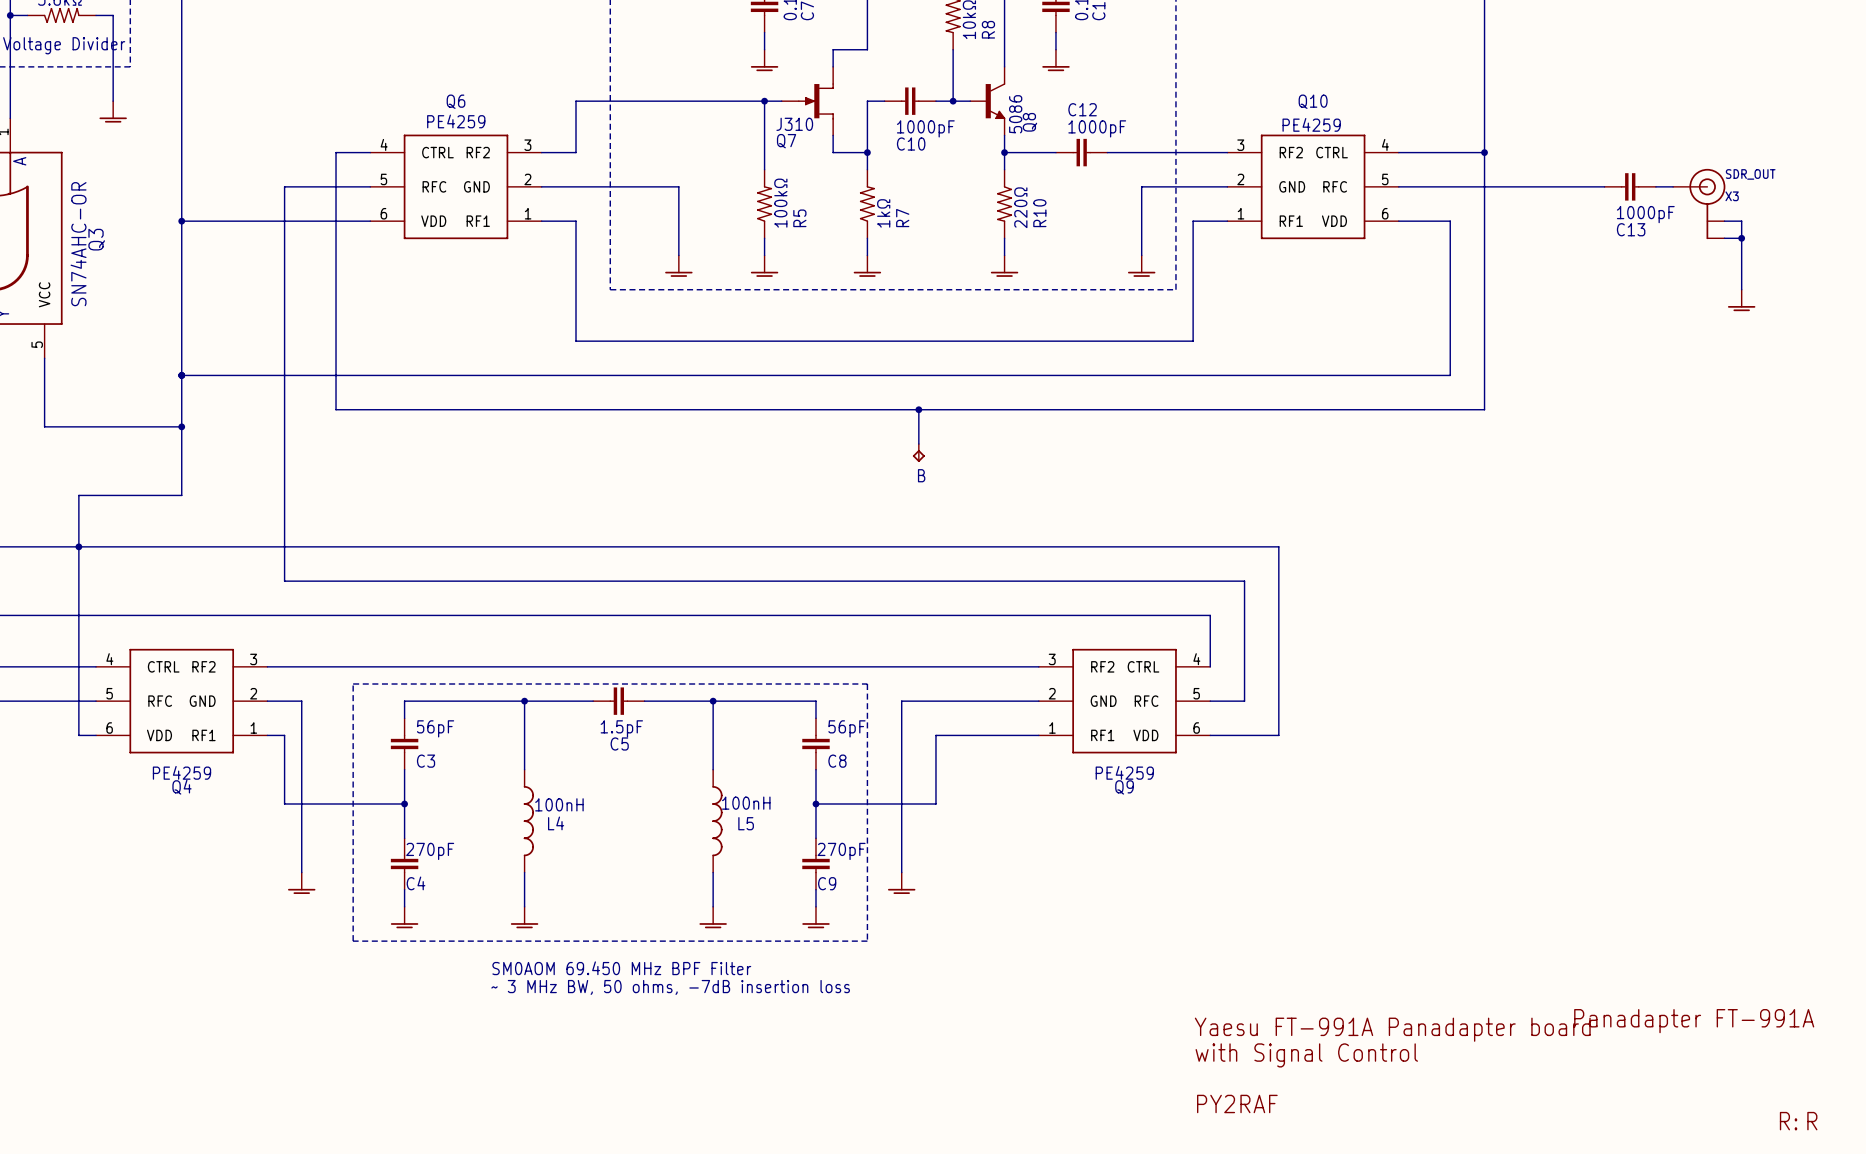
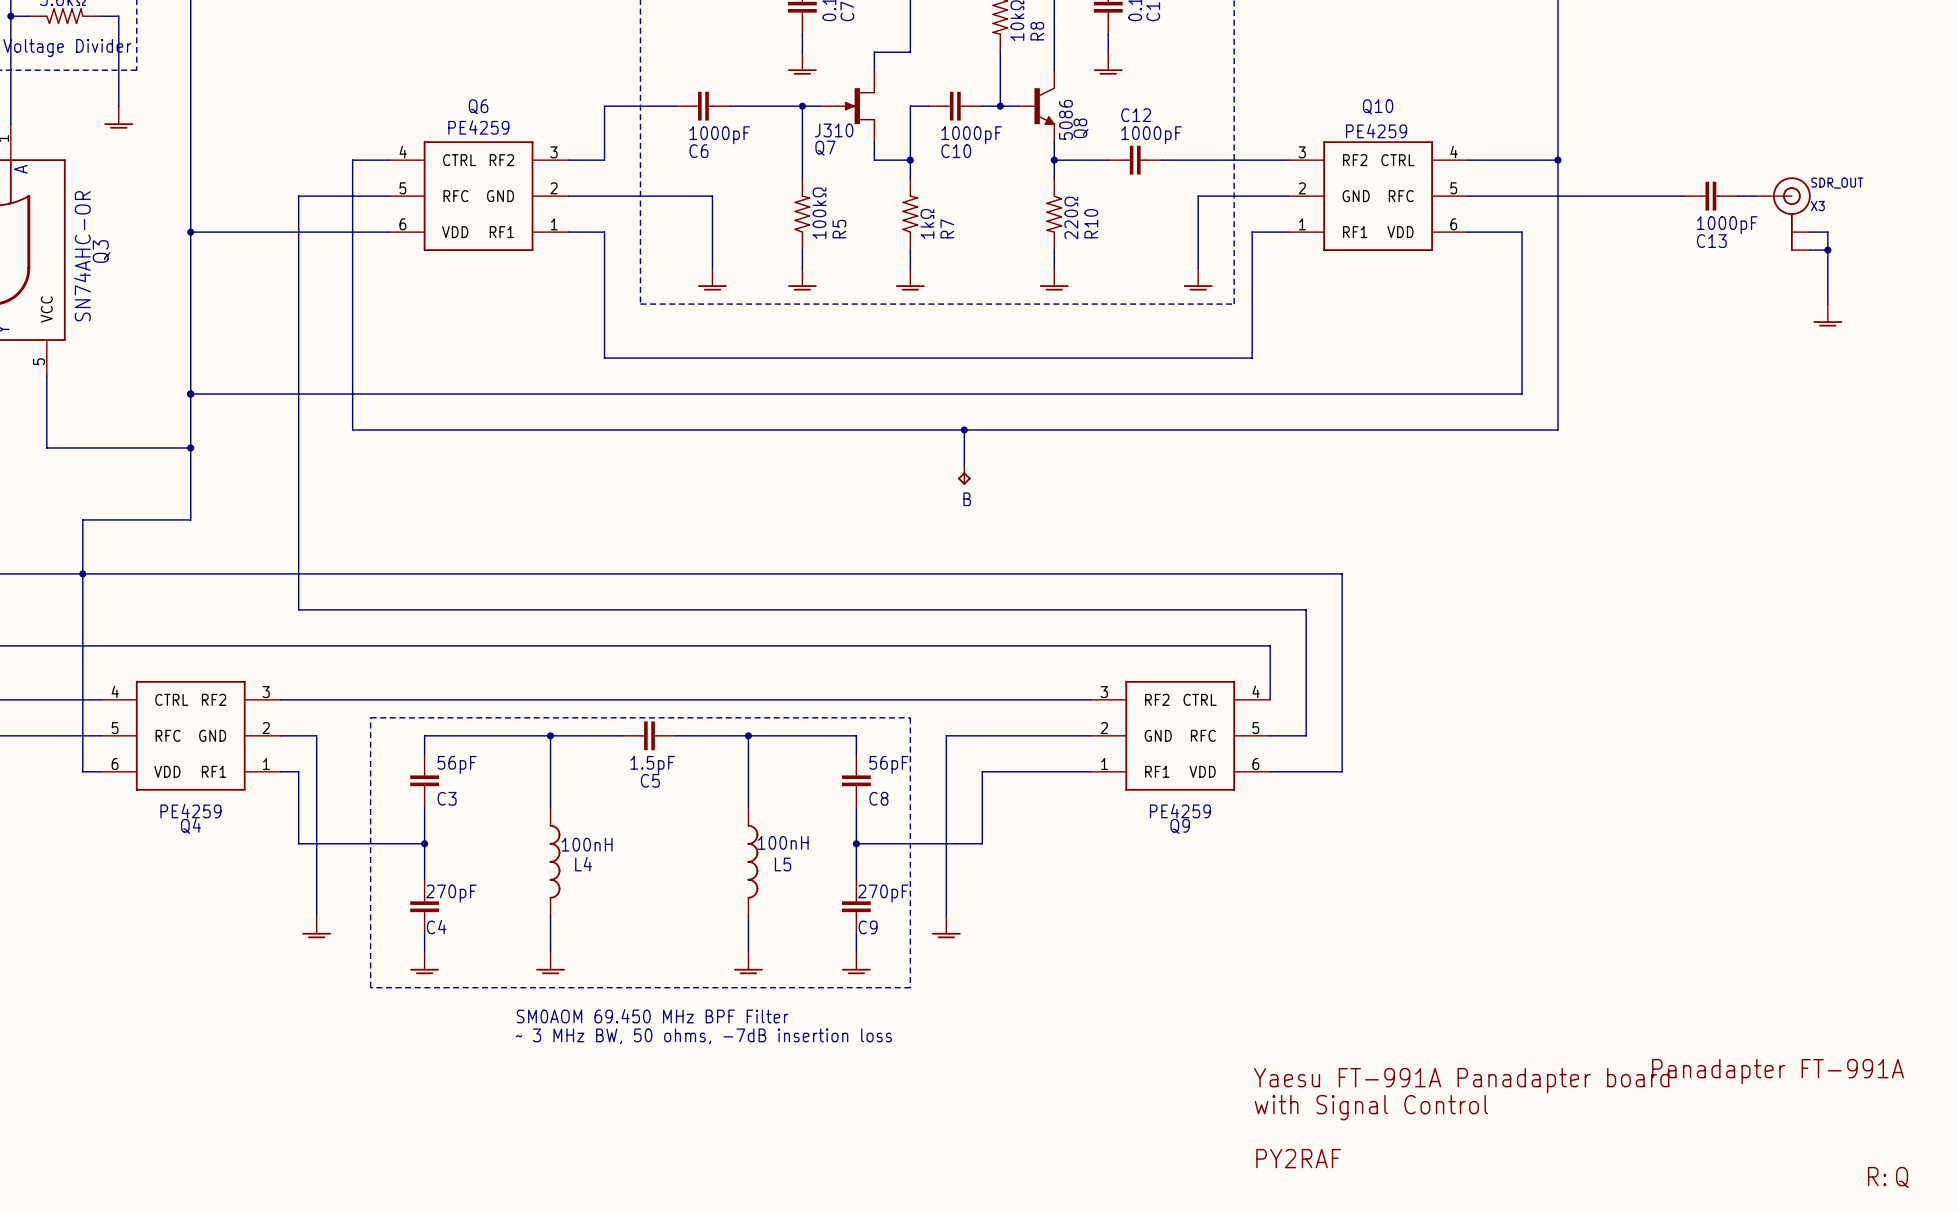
C6: none -> 1000pF (703, 106)
text: R (1812, 1121) -> Q (1902, 1177)

